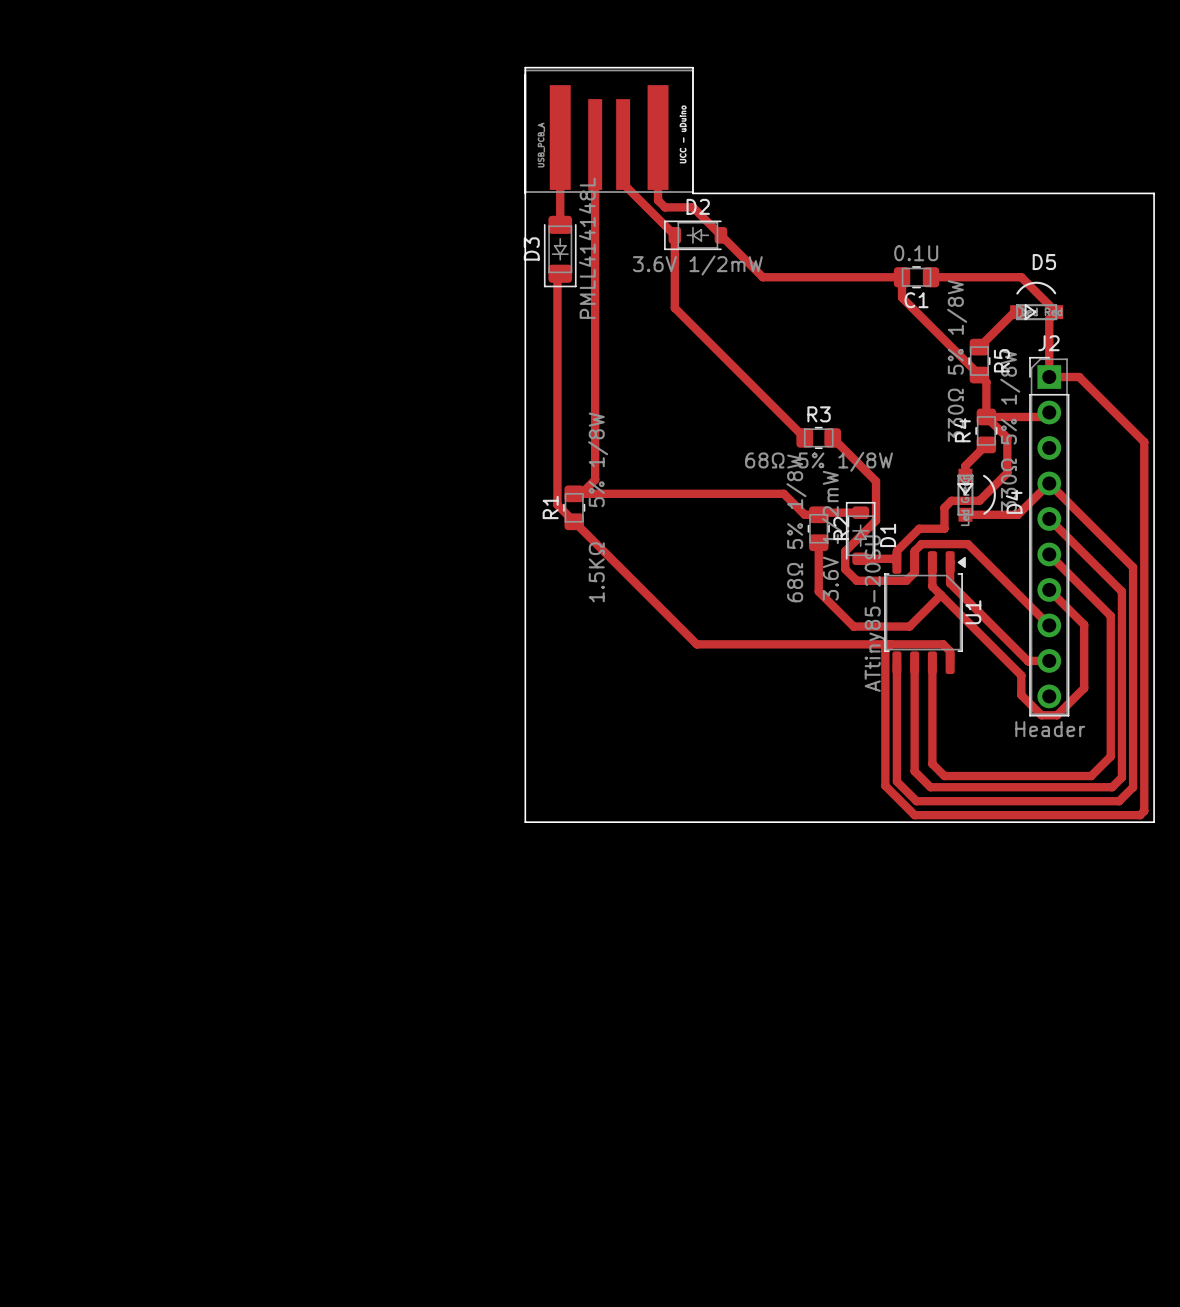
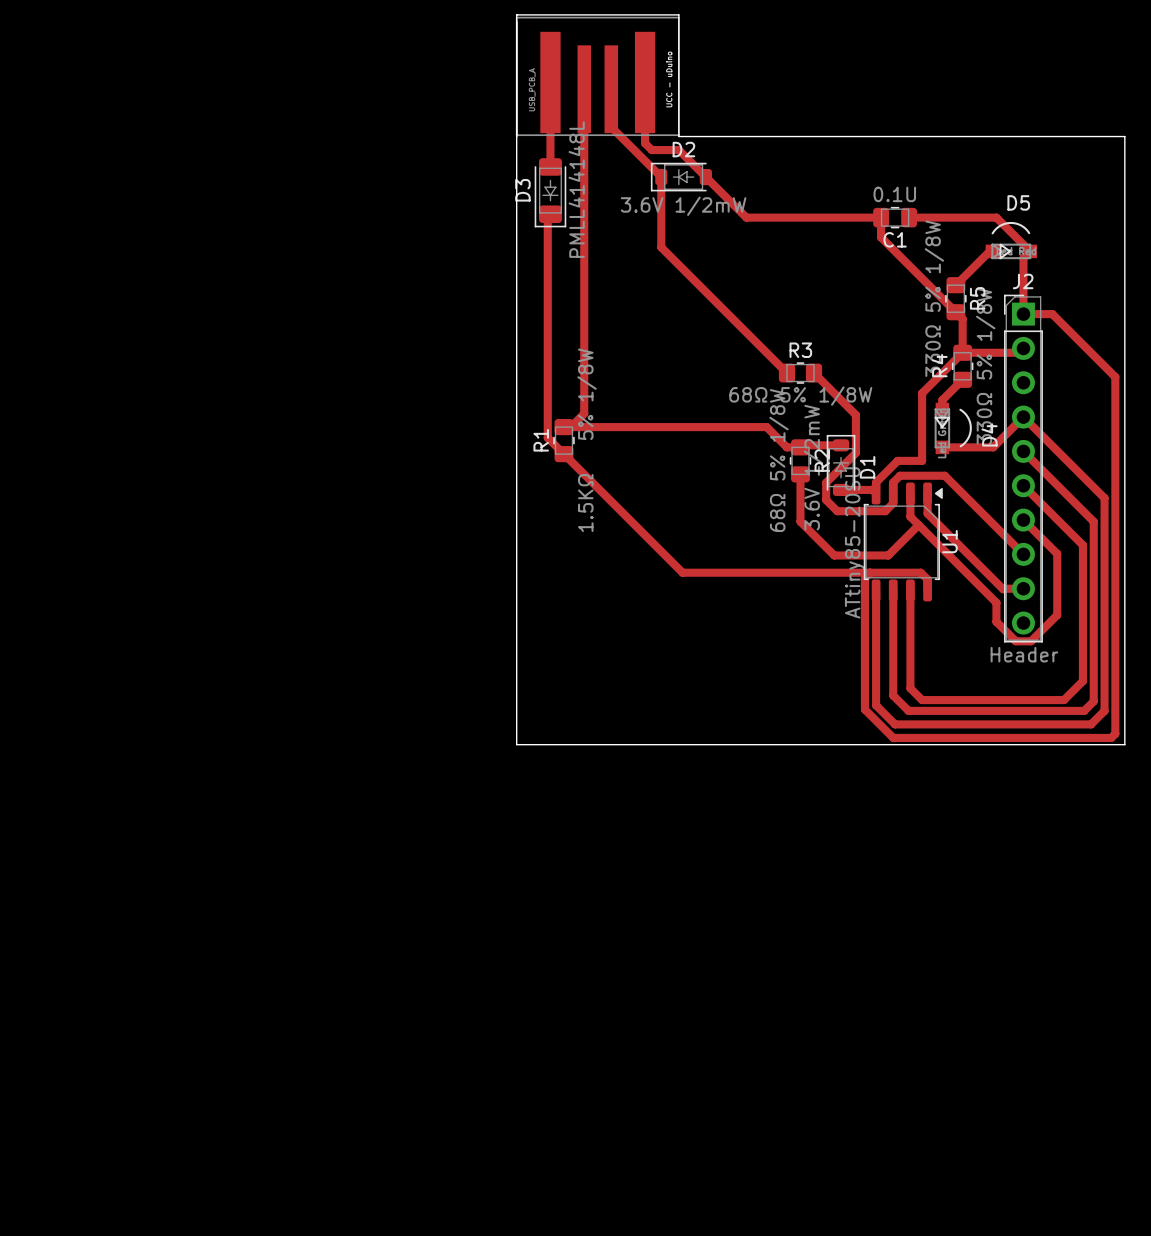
track: (986, 416) (1007, 437) (1007, 472) (979, 500) (951, 500) (944, 507) -> (962, 352) (922, 393) (922, 440)

